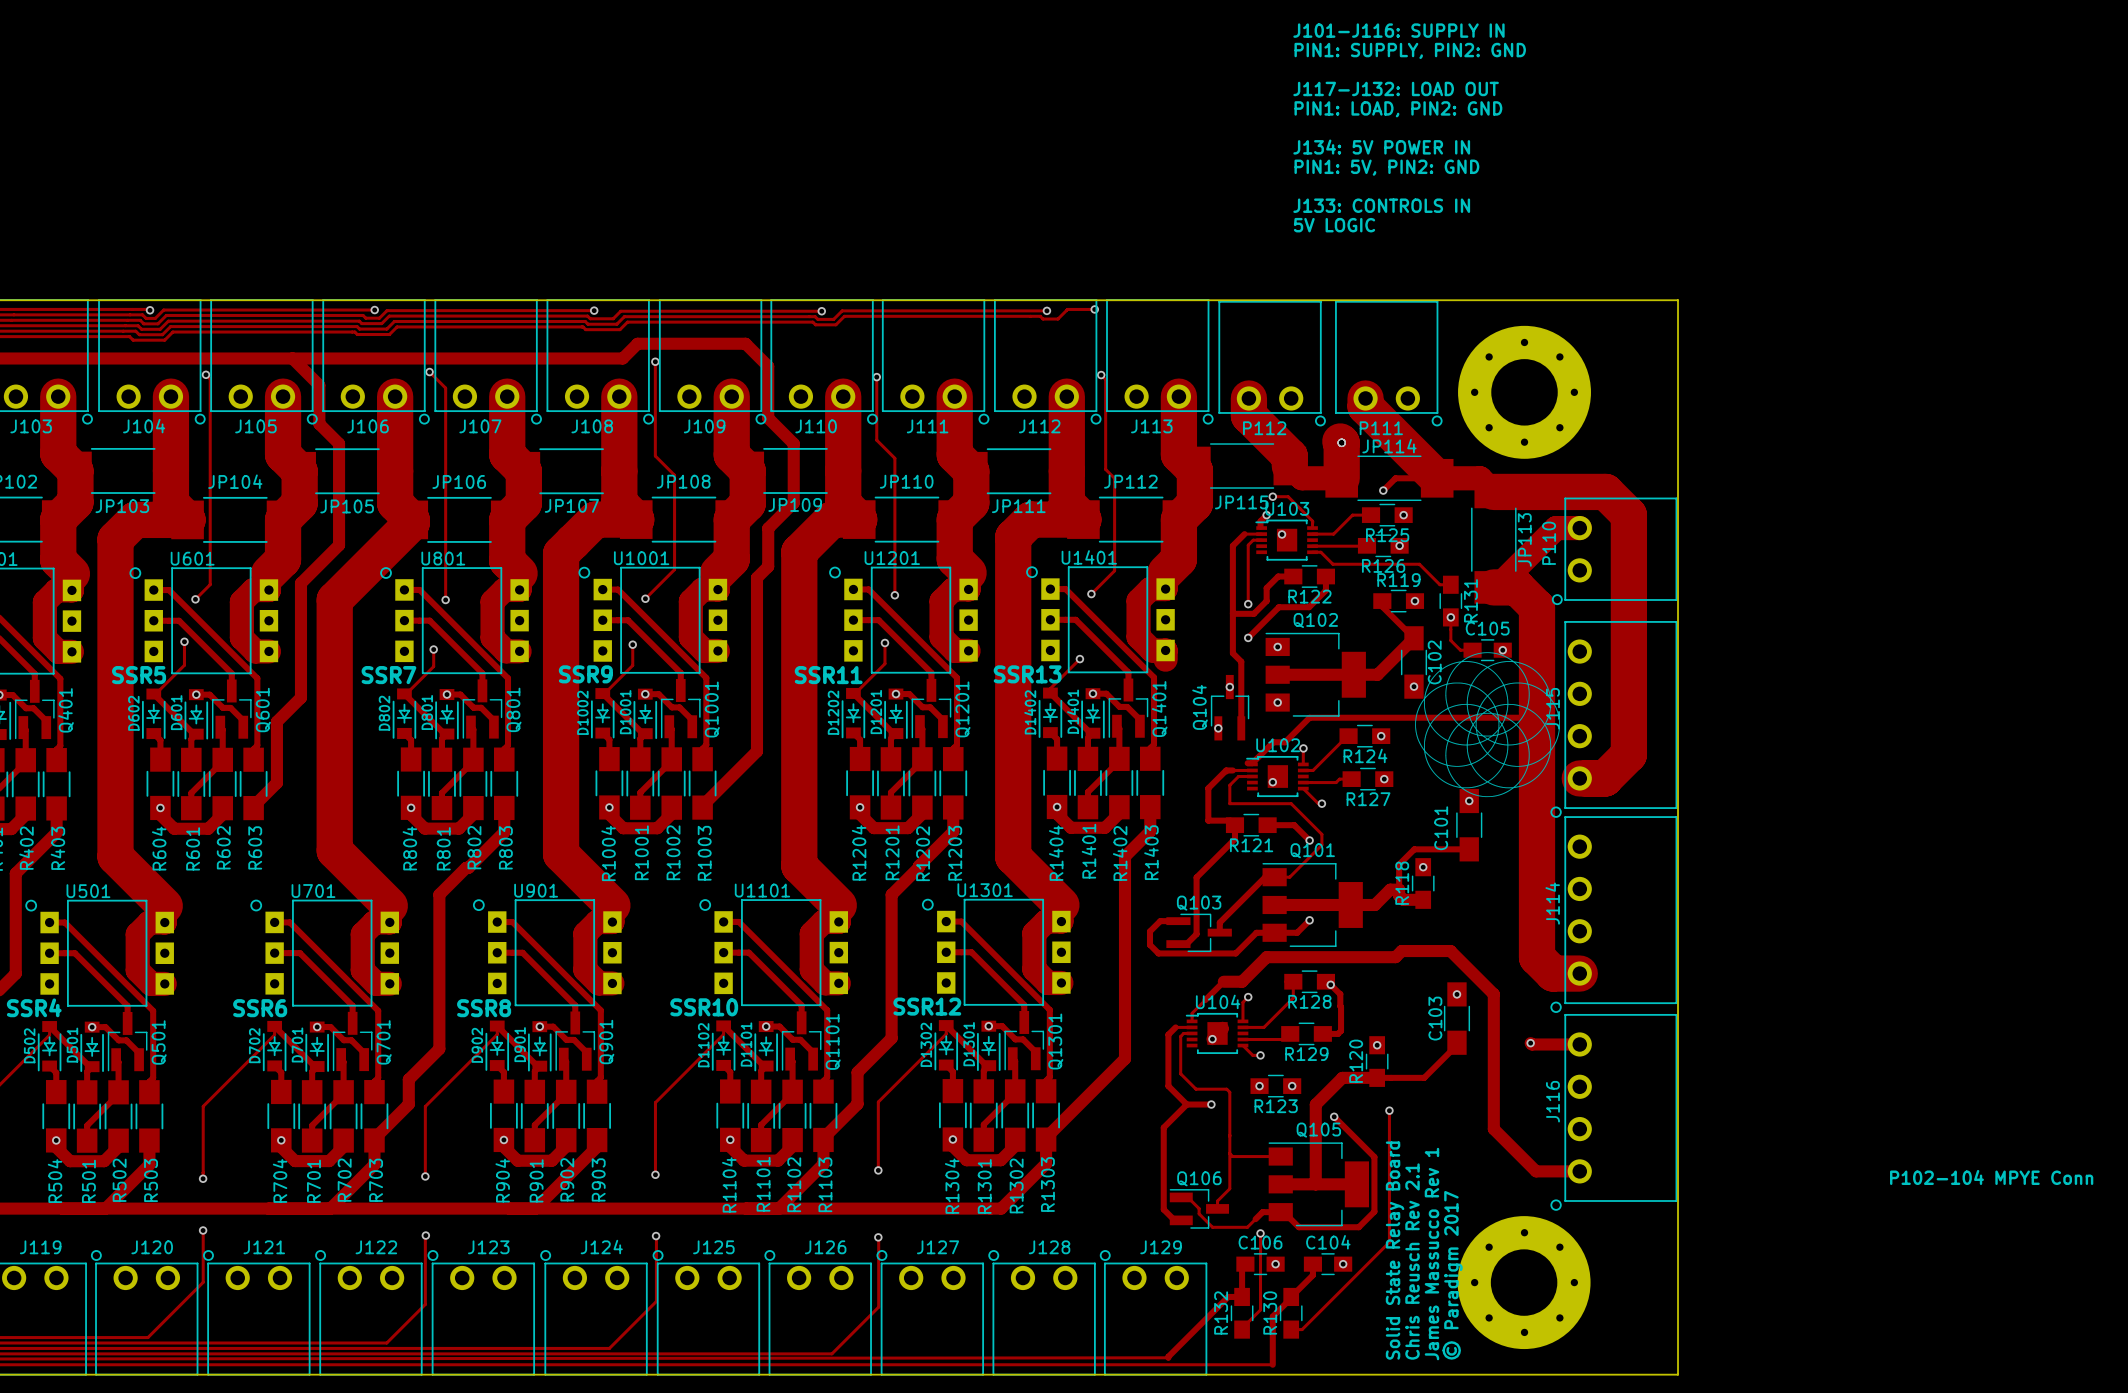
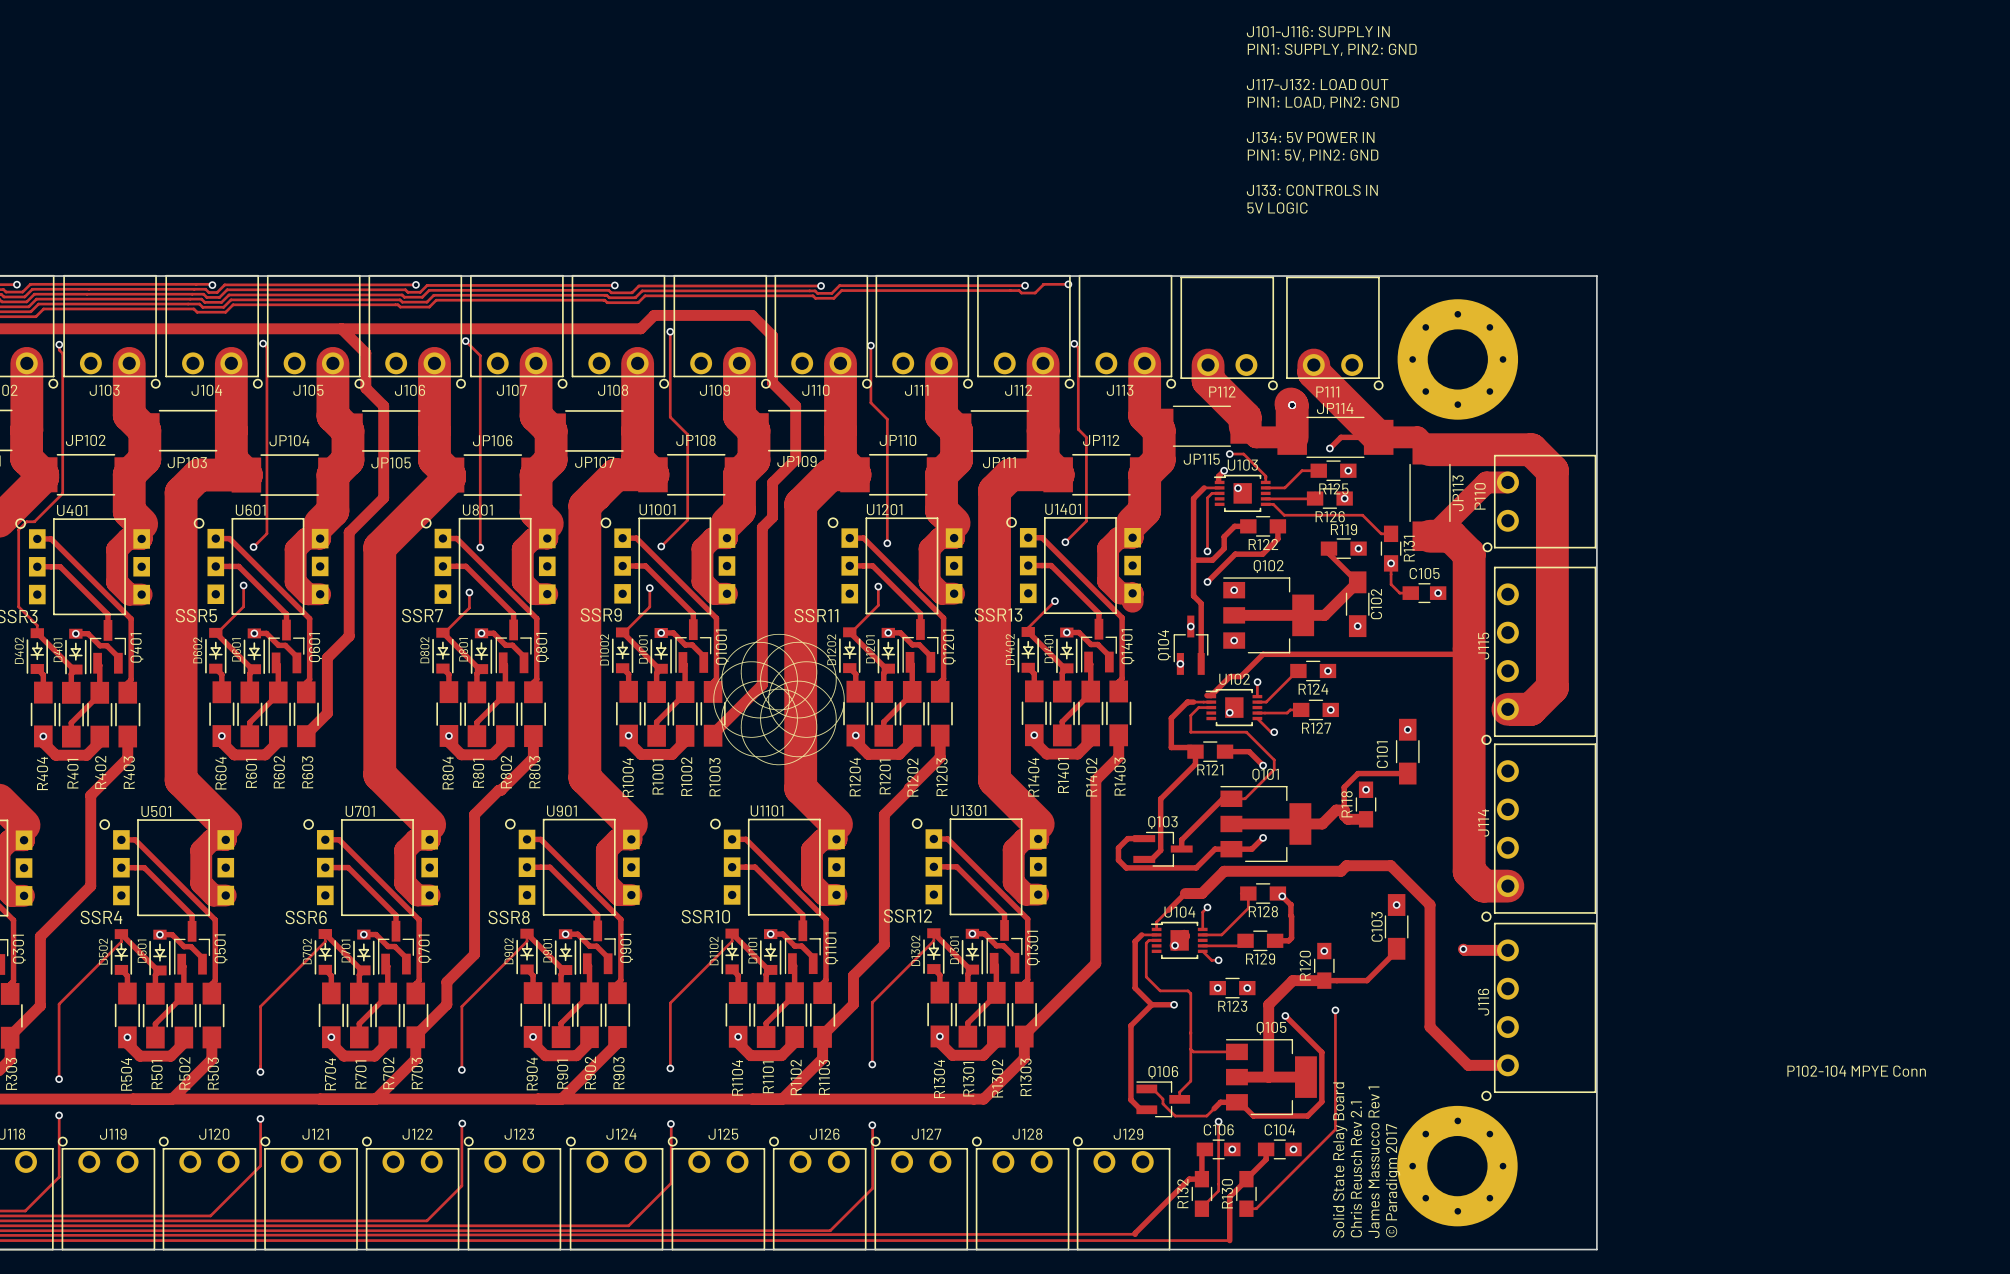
drawing: [1415, 652, 1560, 798] -> none
drawing: none -> [713, 633, 845, 766]

